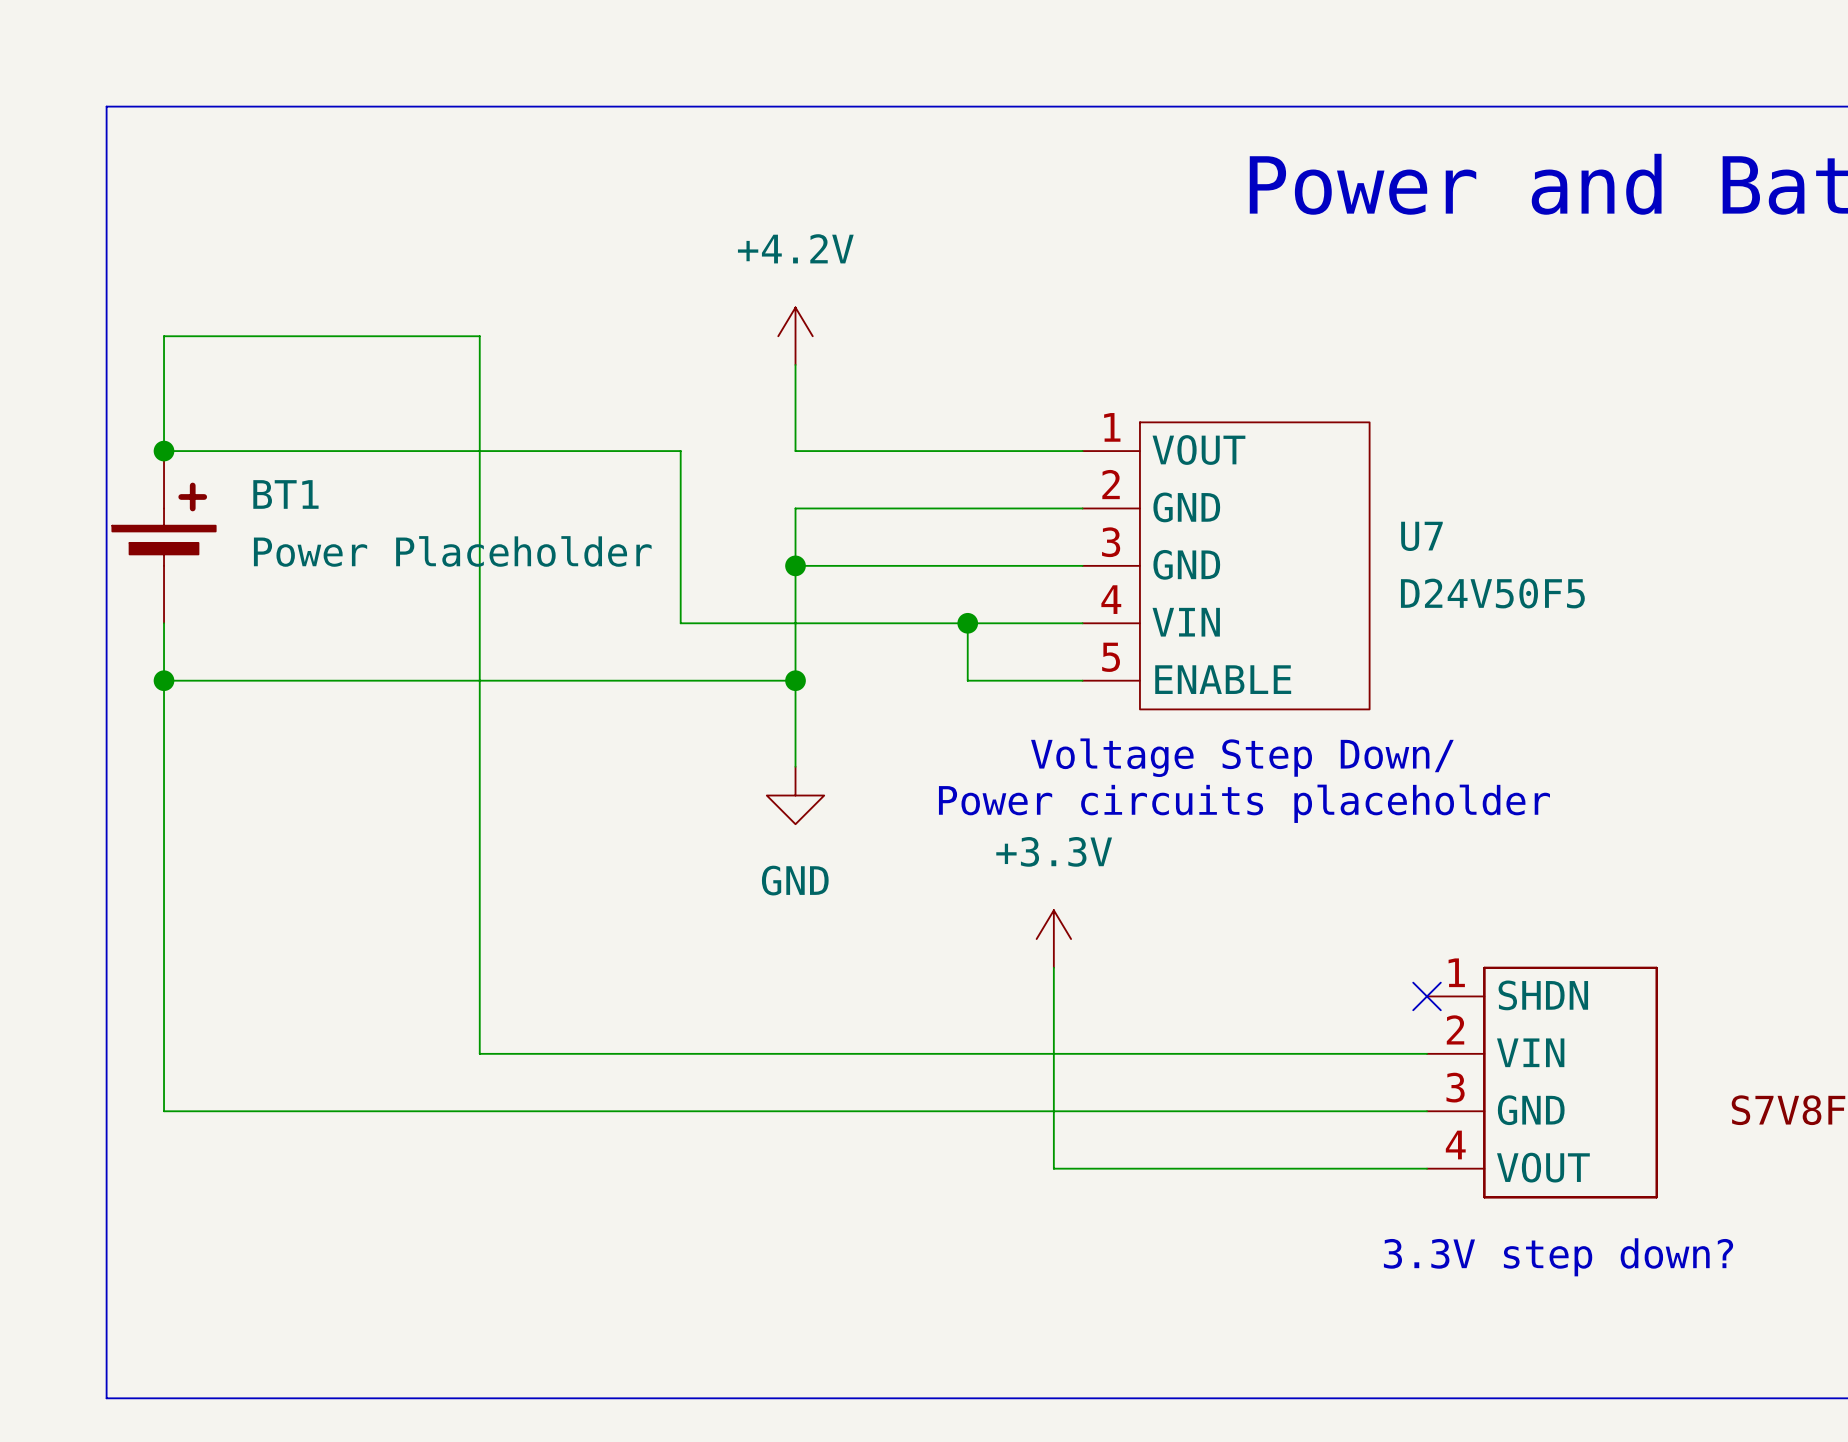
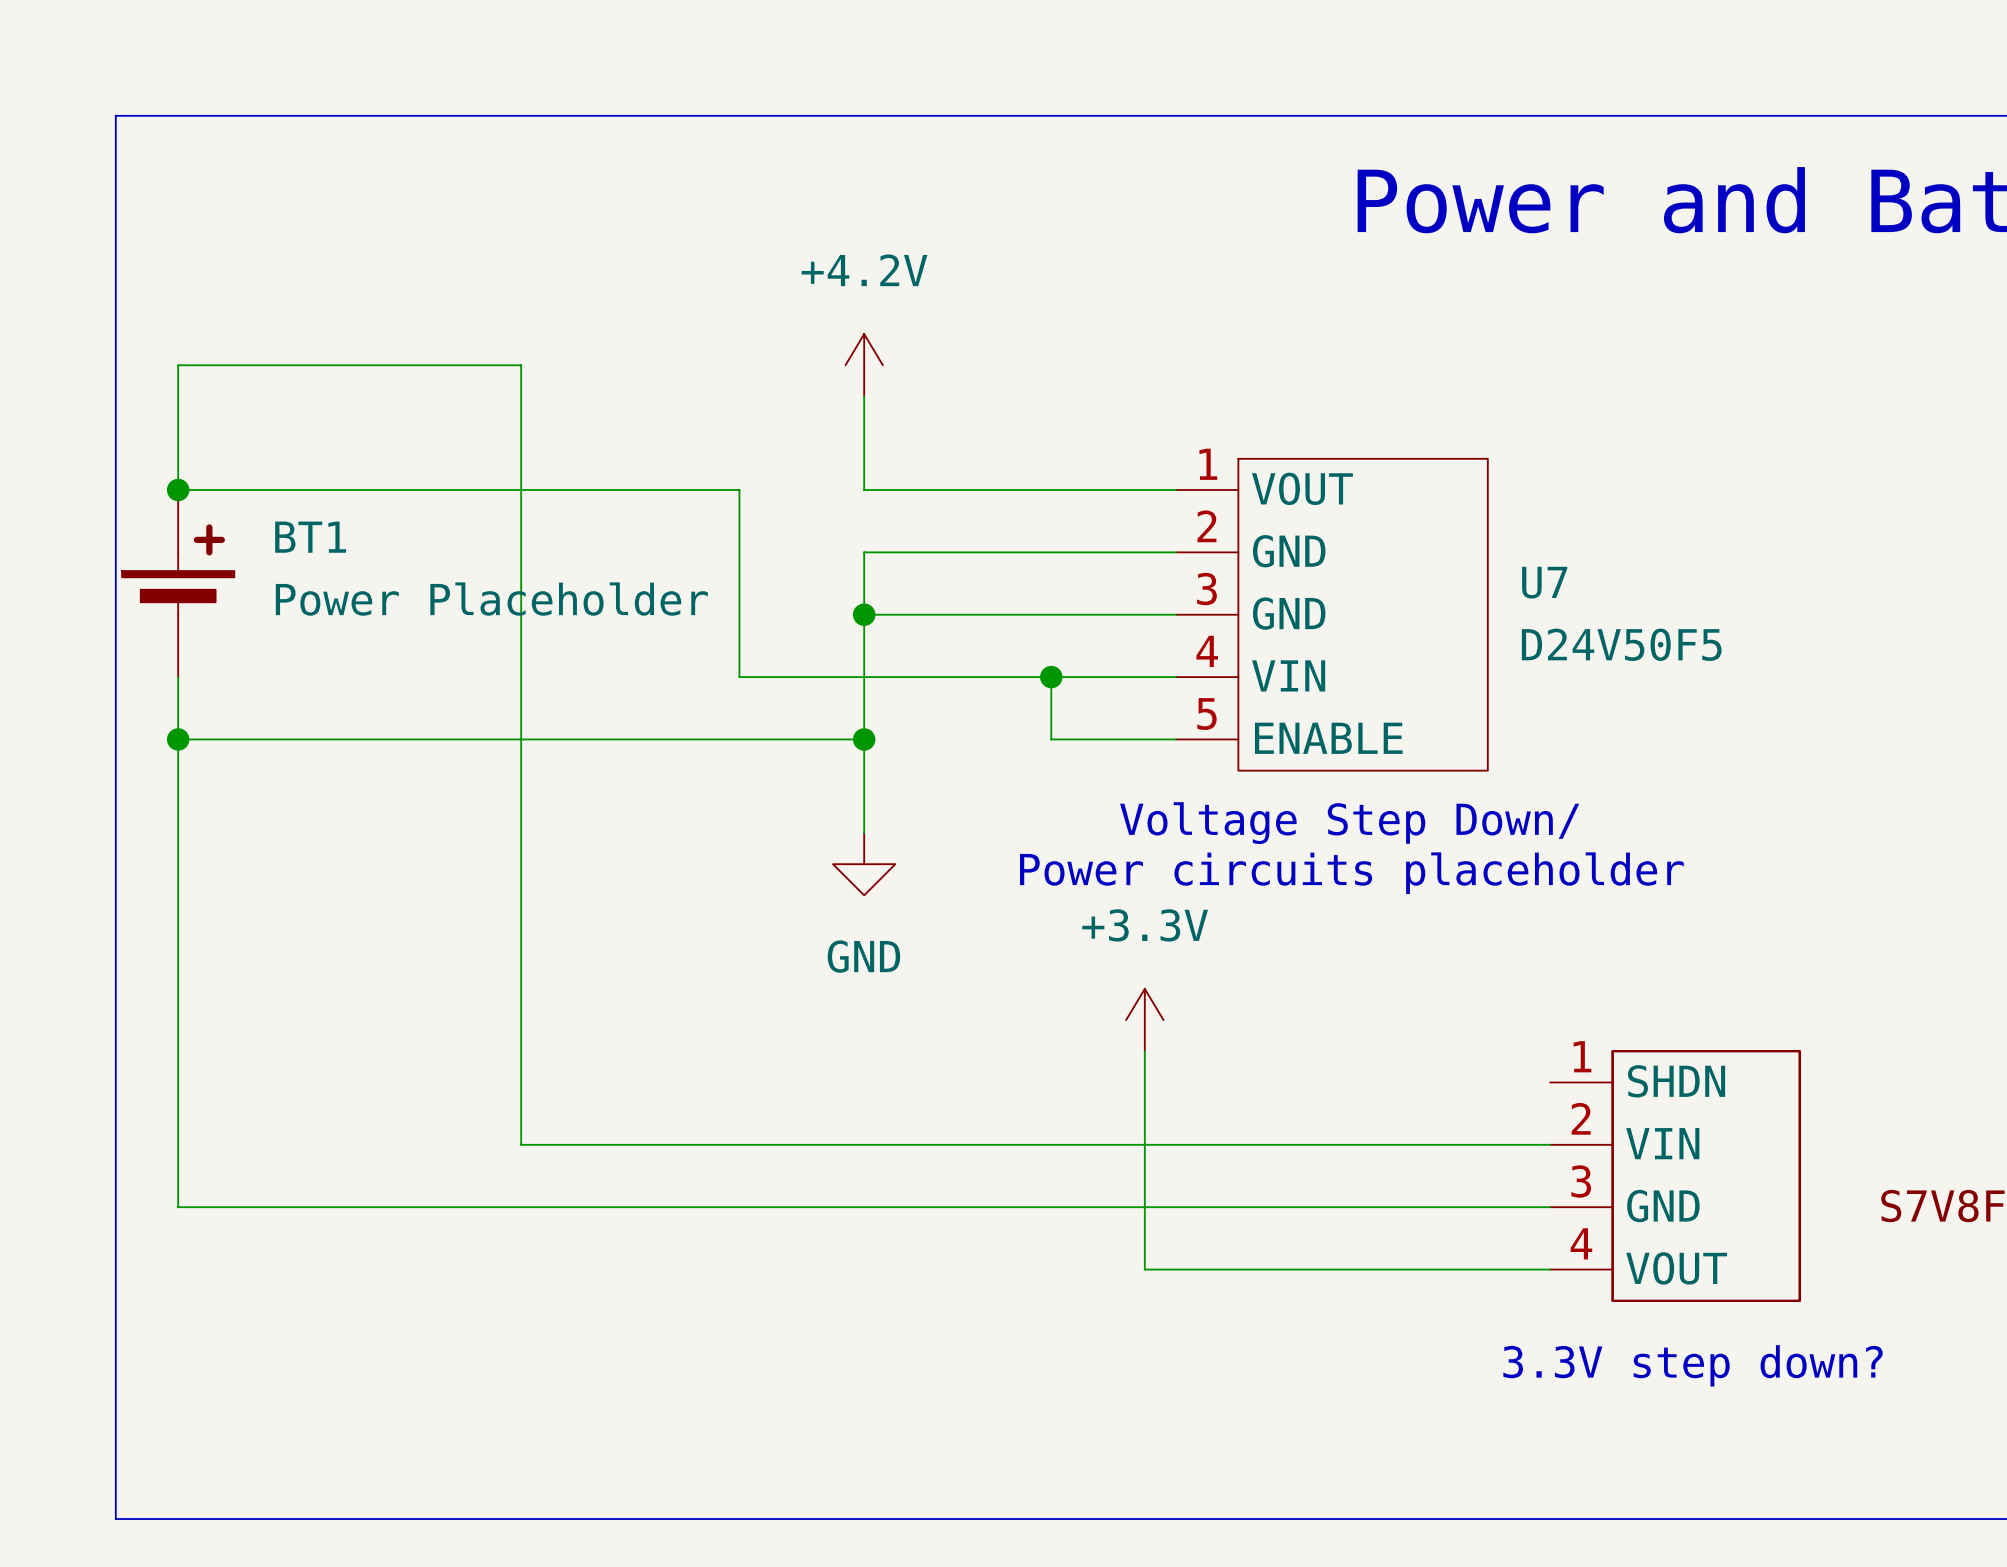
no-connect mark: (1427, 996) -> none

